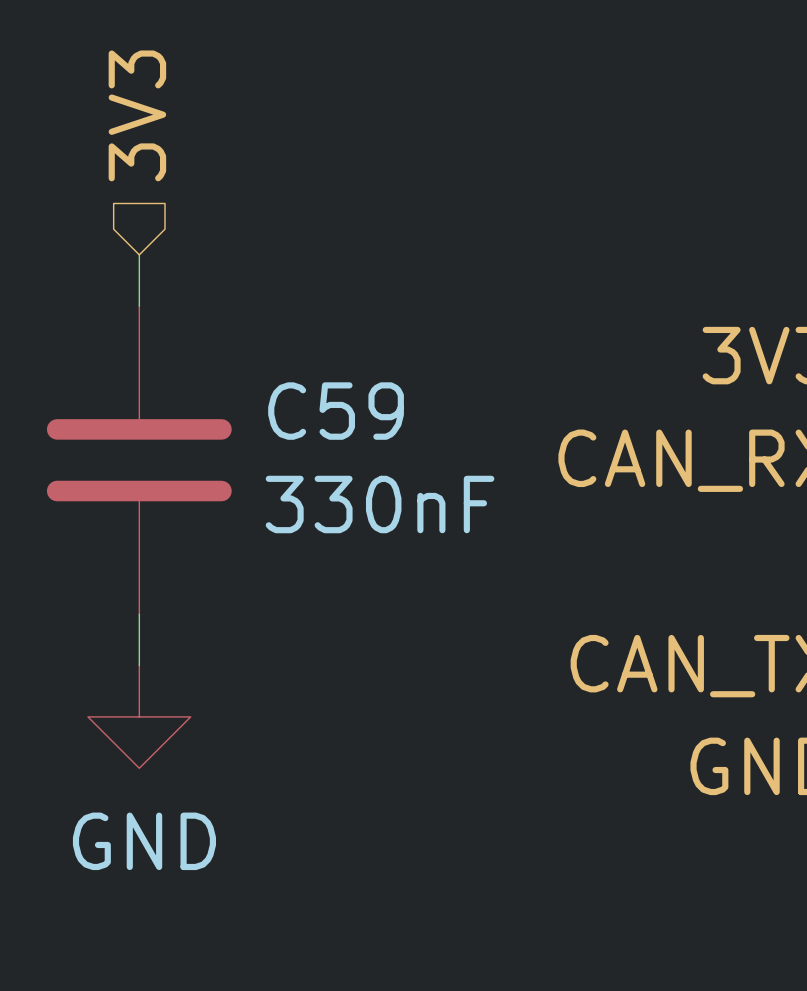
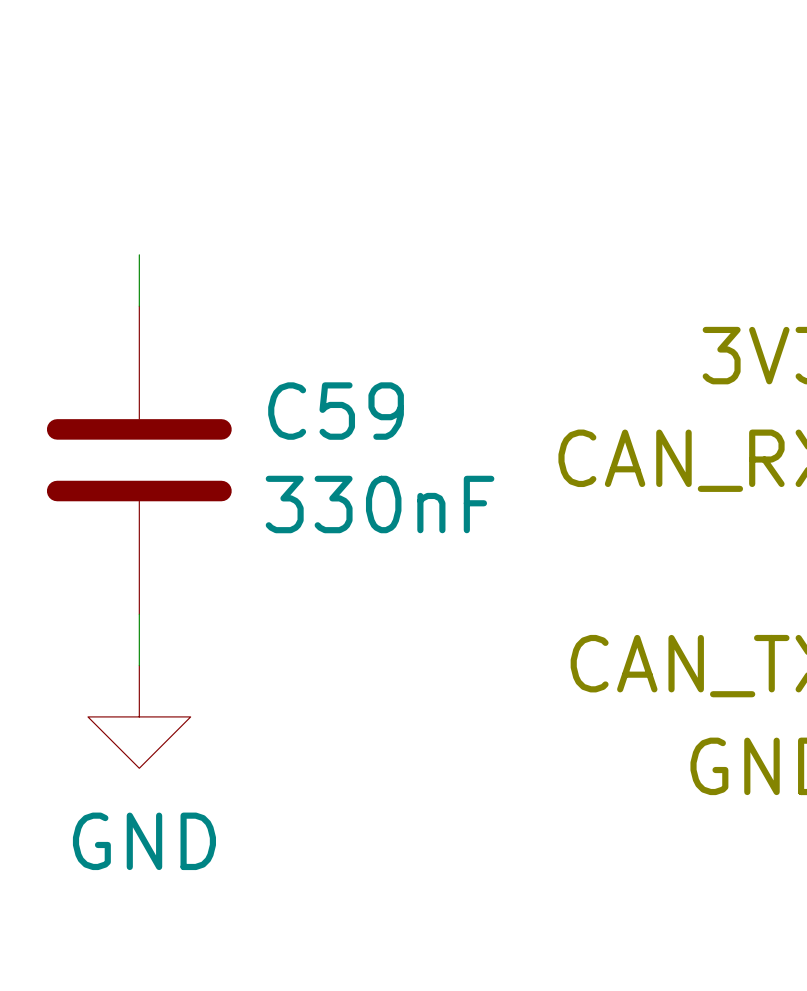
hierarchical label: 3V3 (137, 115) -> none

